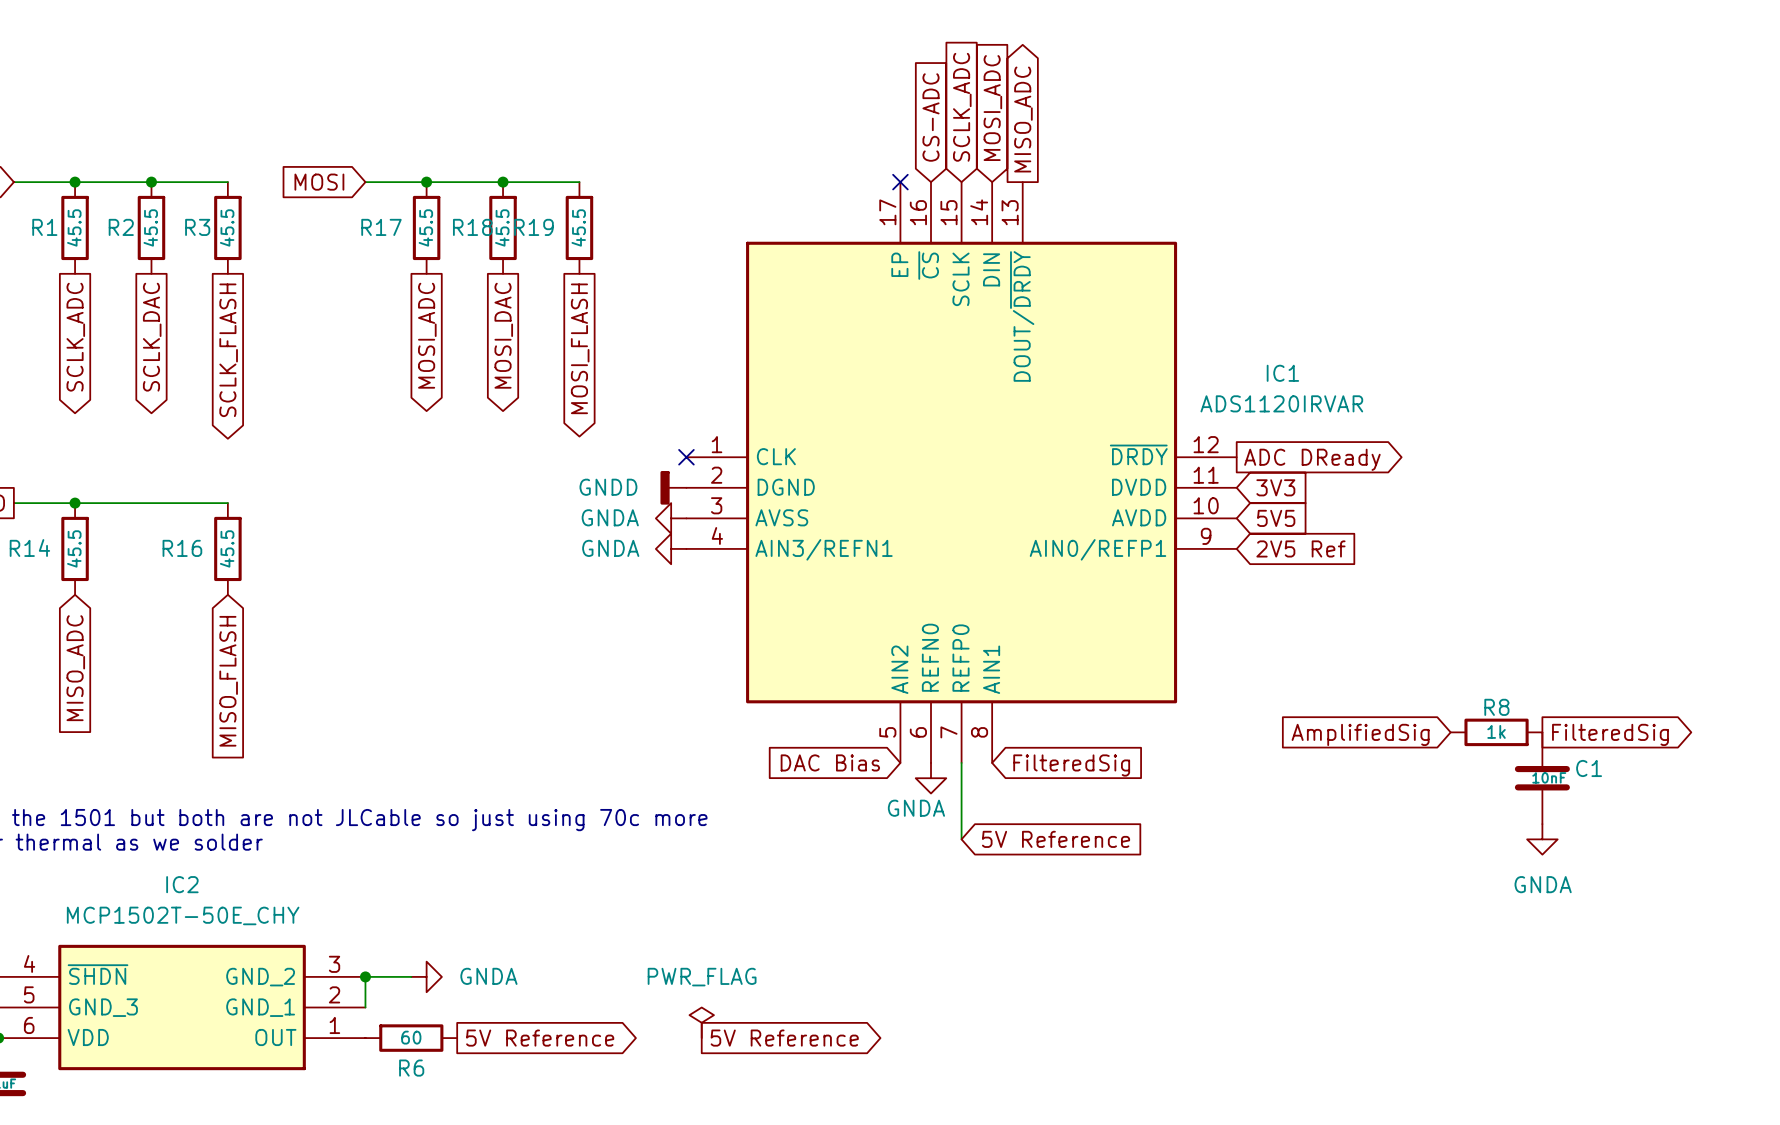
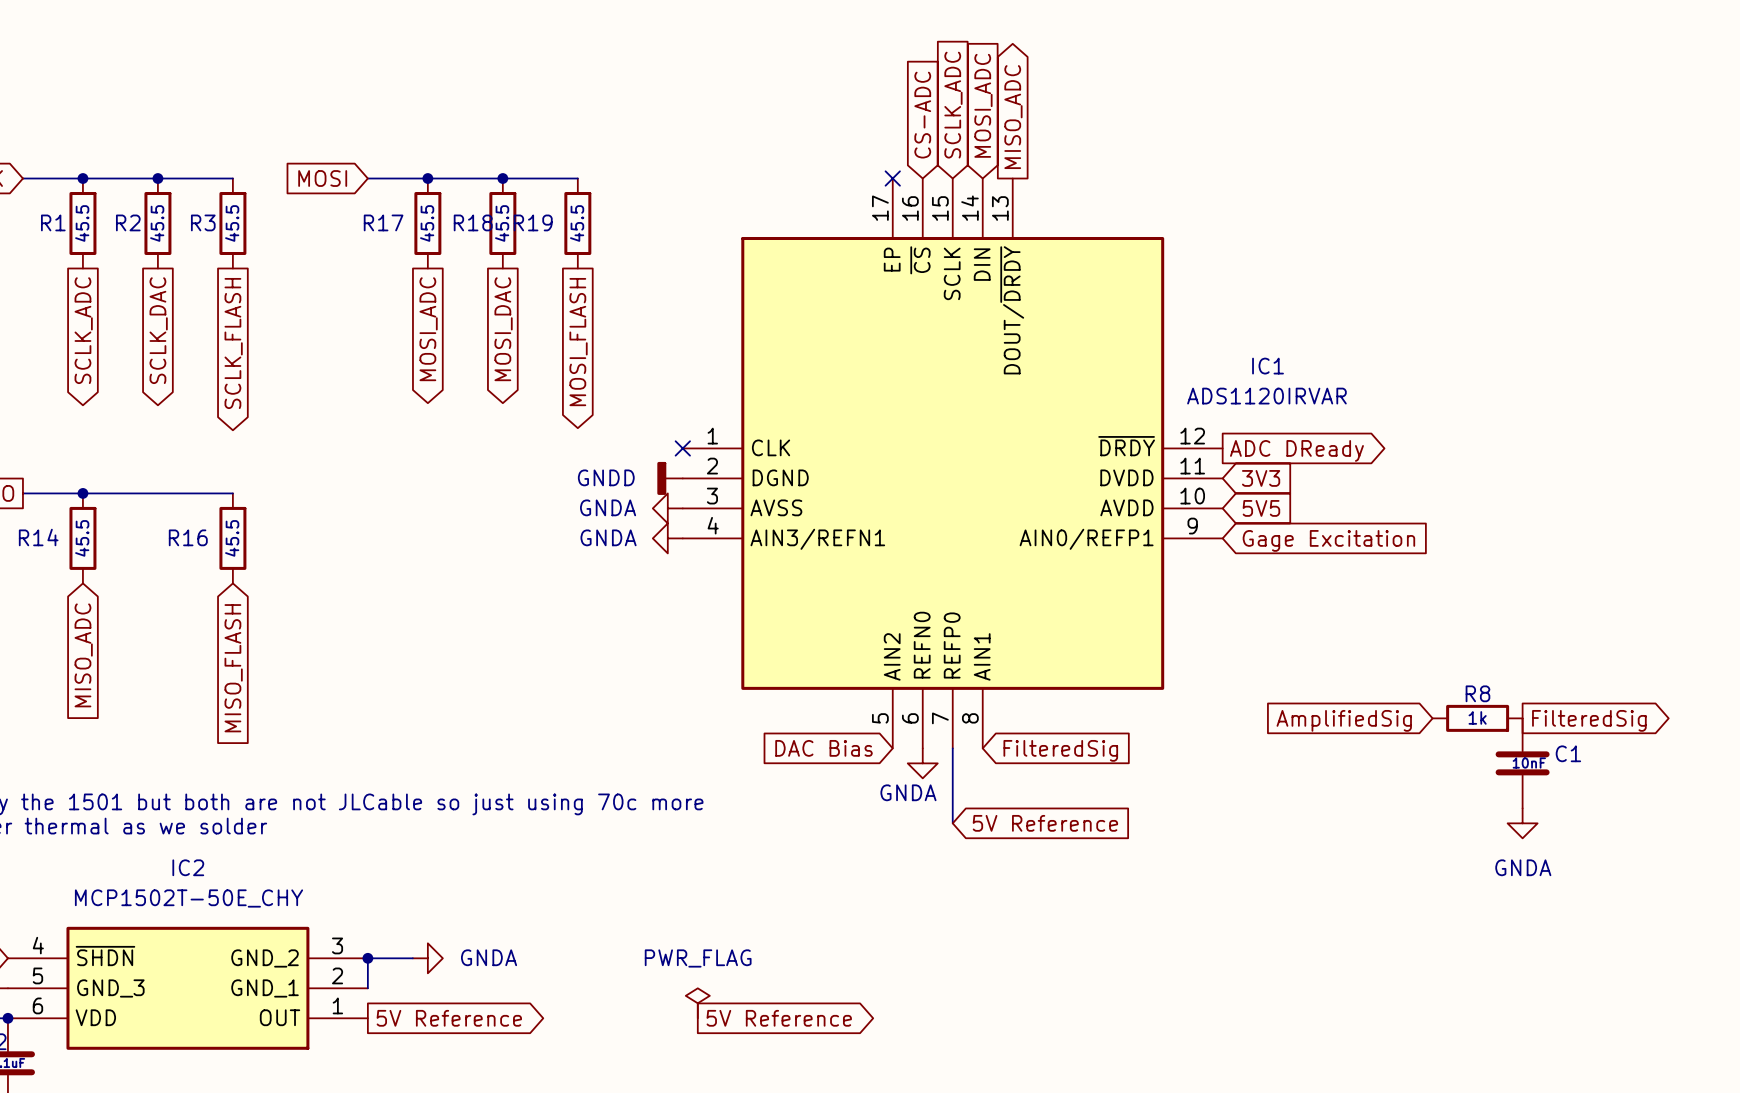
global label: 2V5 Ref (1300, 548) -> Gage Excitation (1328, 540)
R6: 60 (411, 1038) -> none
global label position: 5V Reference (540, 1038) -> 5V Reference (449, 1018)

